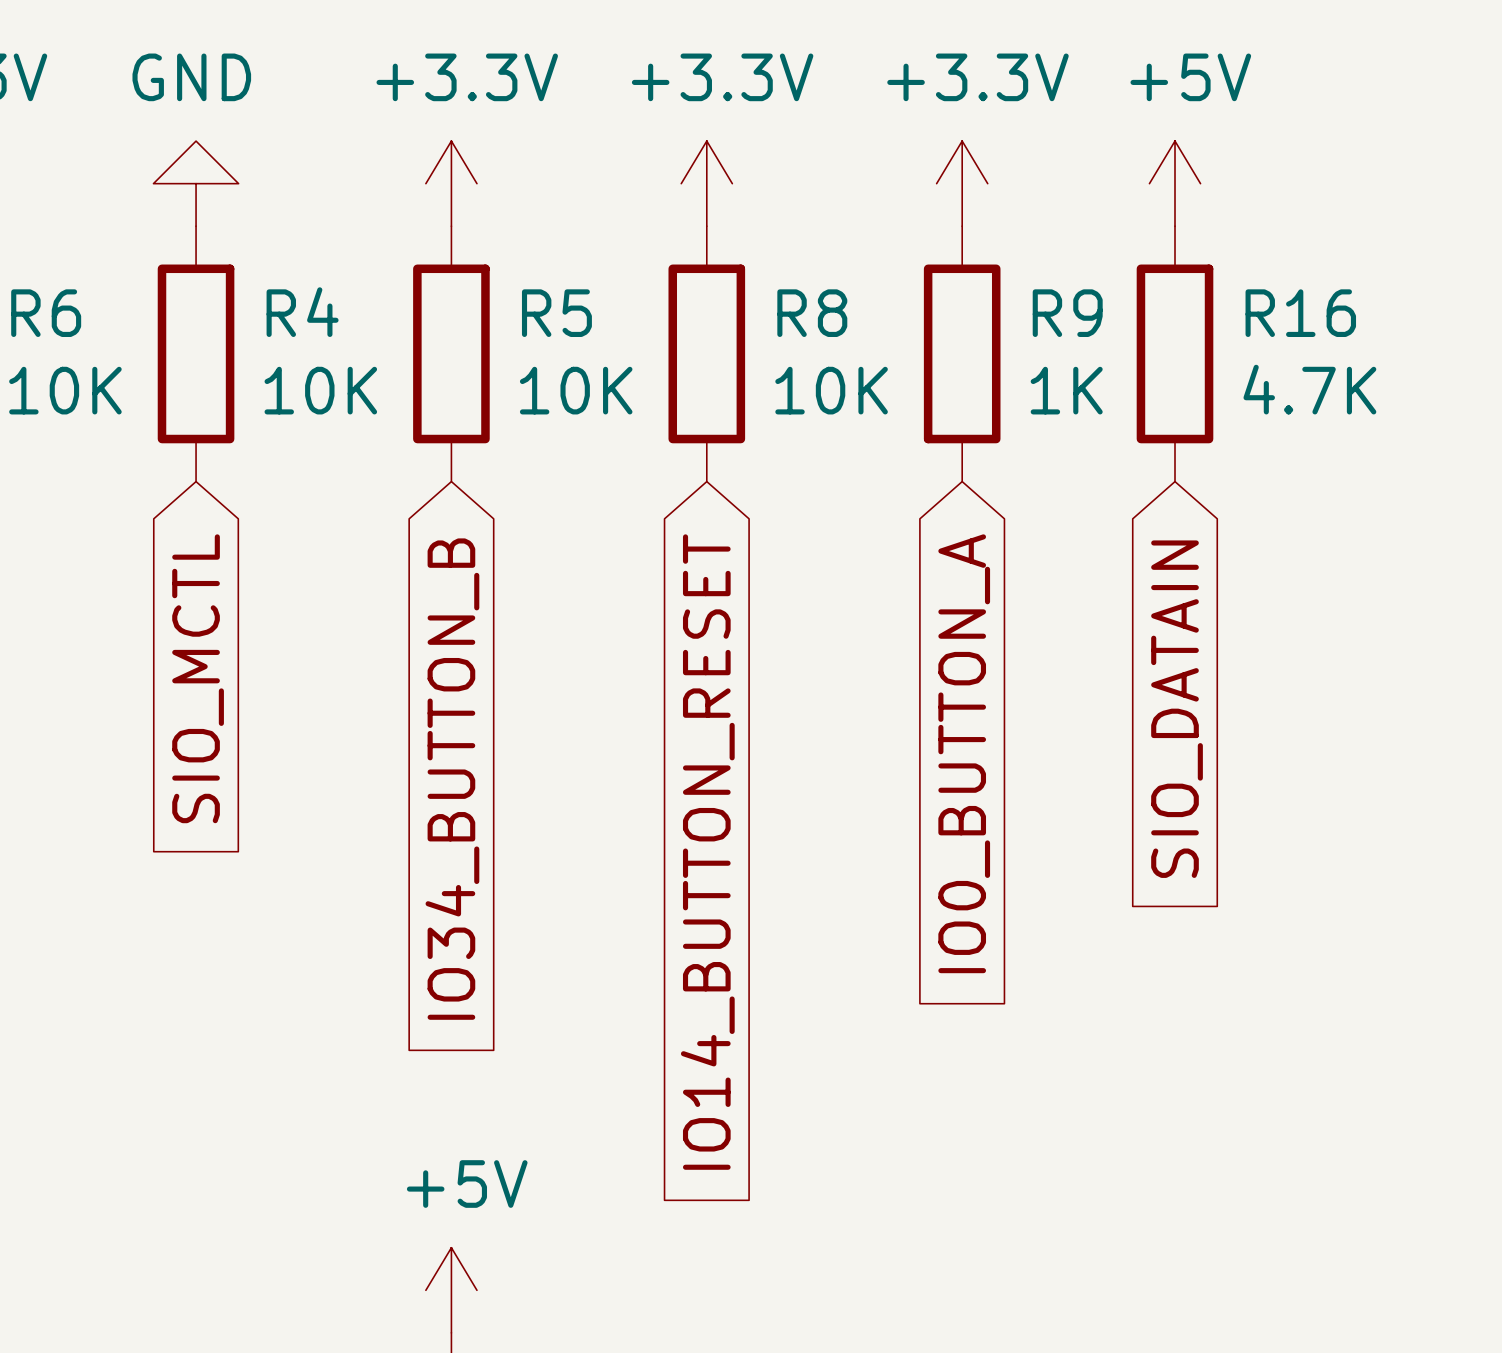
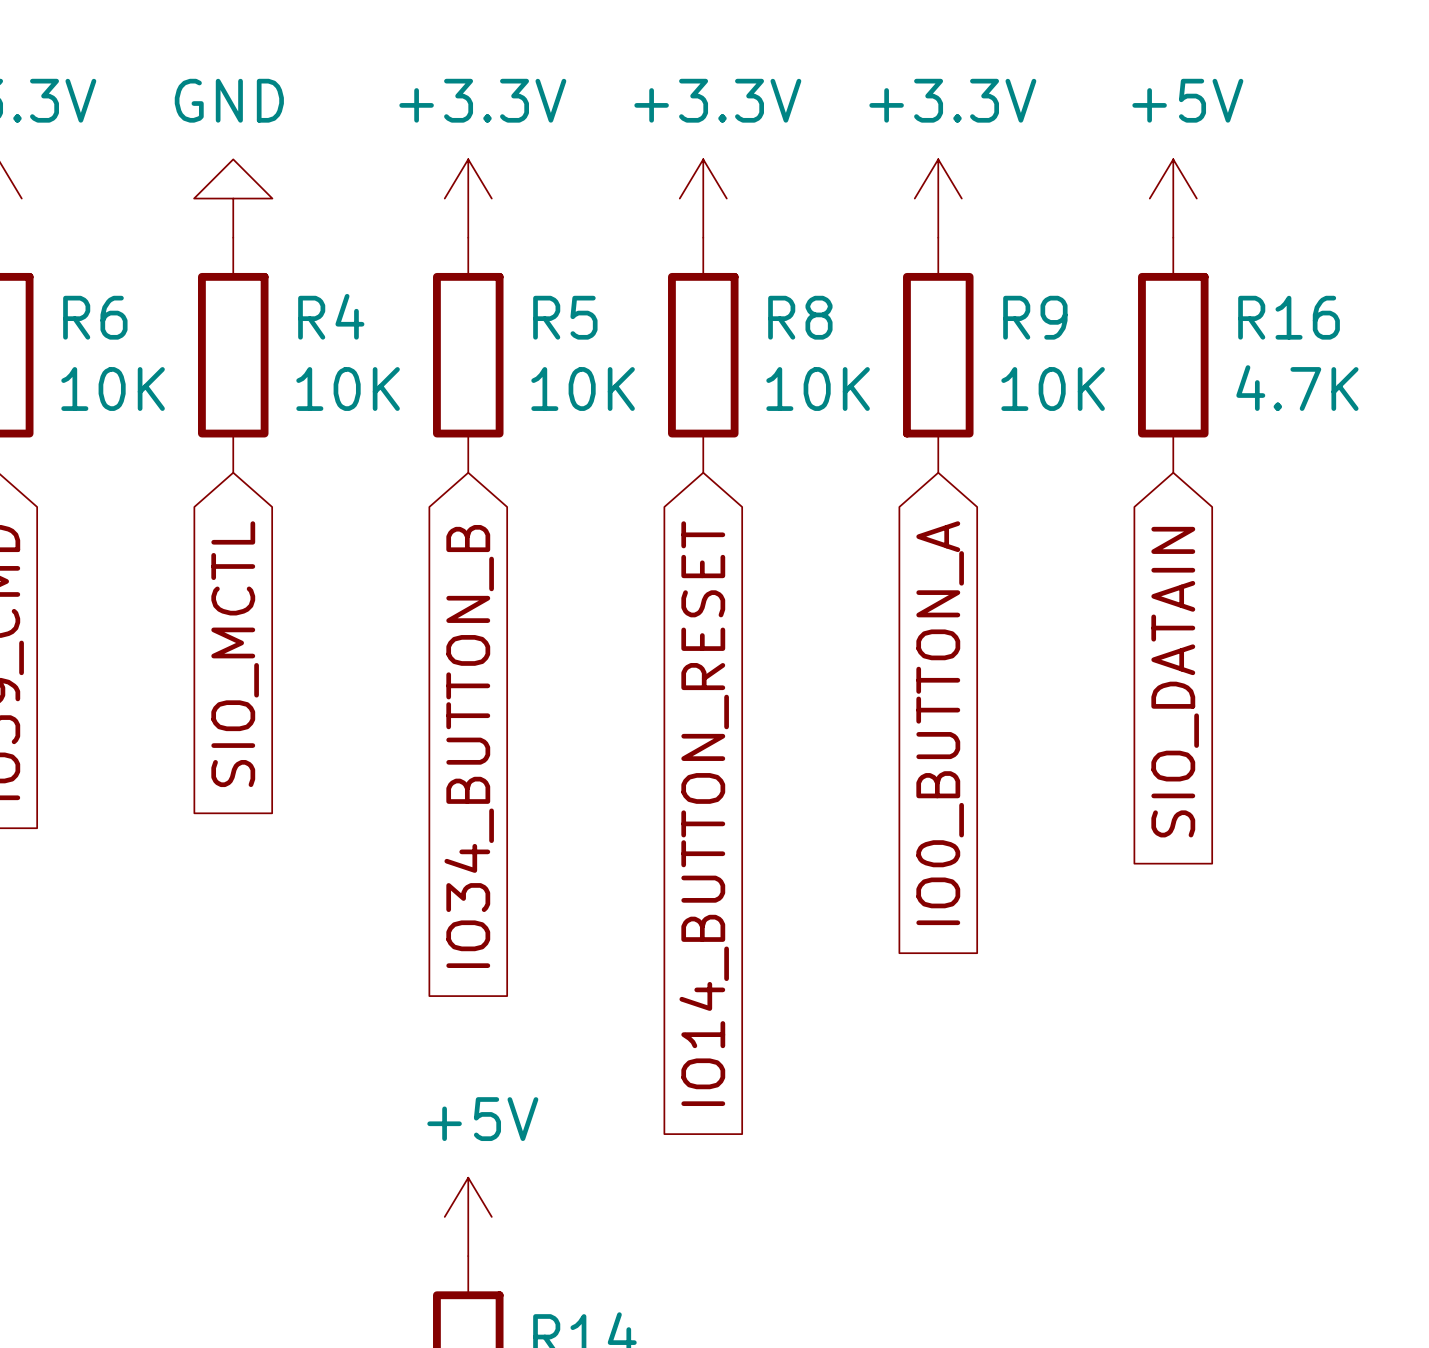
power symbol position: +5V (1175, 183) -> +5V (1173, 198)
R16 position: (1175, 353) -> (1173, 355)
R9 value: 1K (1066, 390) -> 10K (1053, 389)
global label position: SIO_DATAIN (1177, 709) -> SIO_DATAIN (1175, 682)

